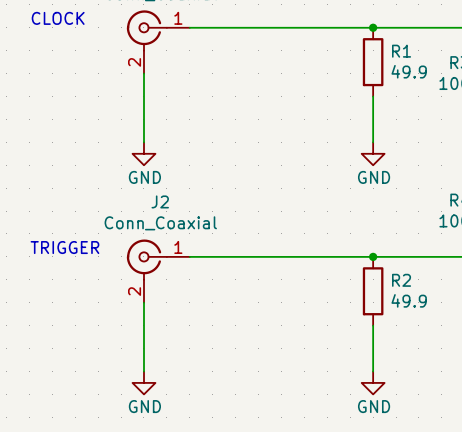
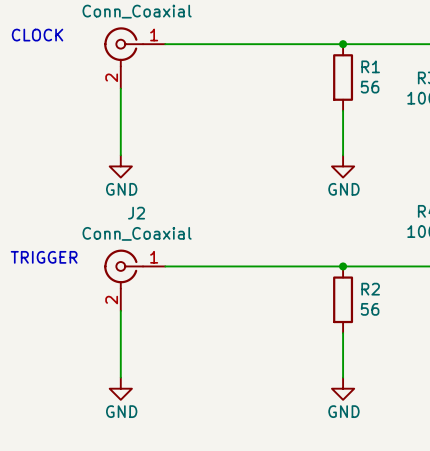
R1 value: 49.9 (409, 71) -> 56 (370, 87)
R2 value: 49.9 (409, 300) -> 56 (370, 309)

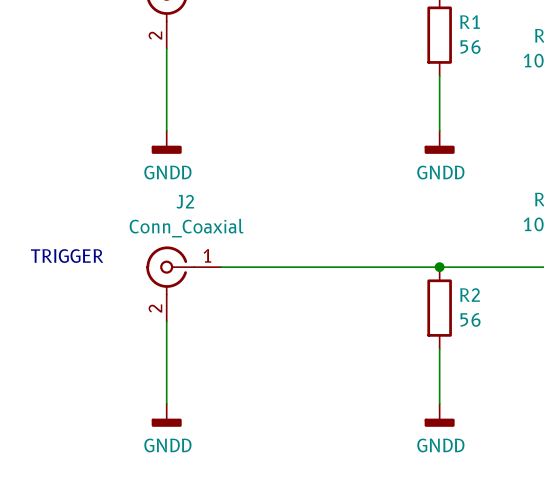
power symbol: GND (120, 166) -> GNDD (166, 142)
power symbol: GND (343, 166) -> GNDD (439, 142)
power symbol: GND (120, 388) -> GNDD (166, 415)
power symbol: GND (343, 388) -> GNDD (439, 415)

